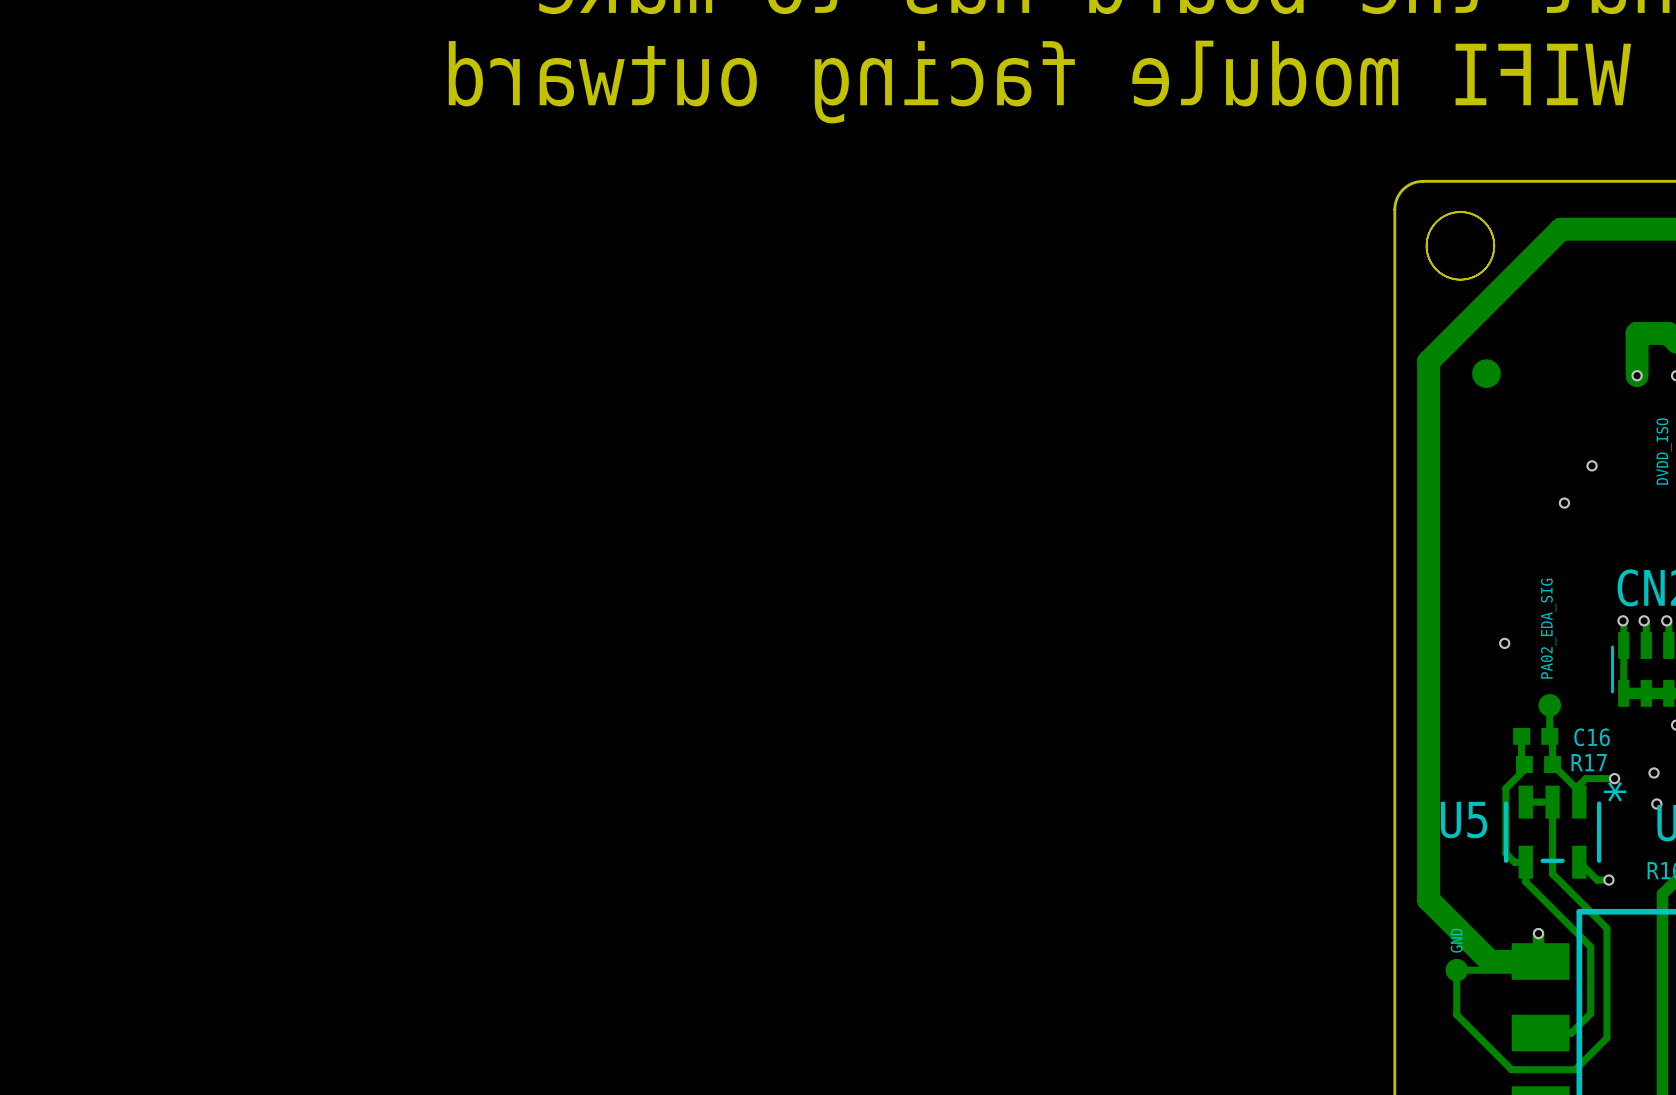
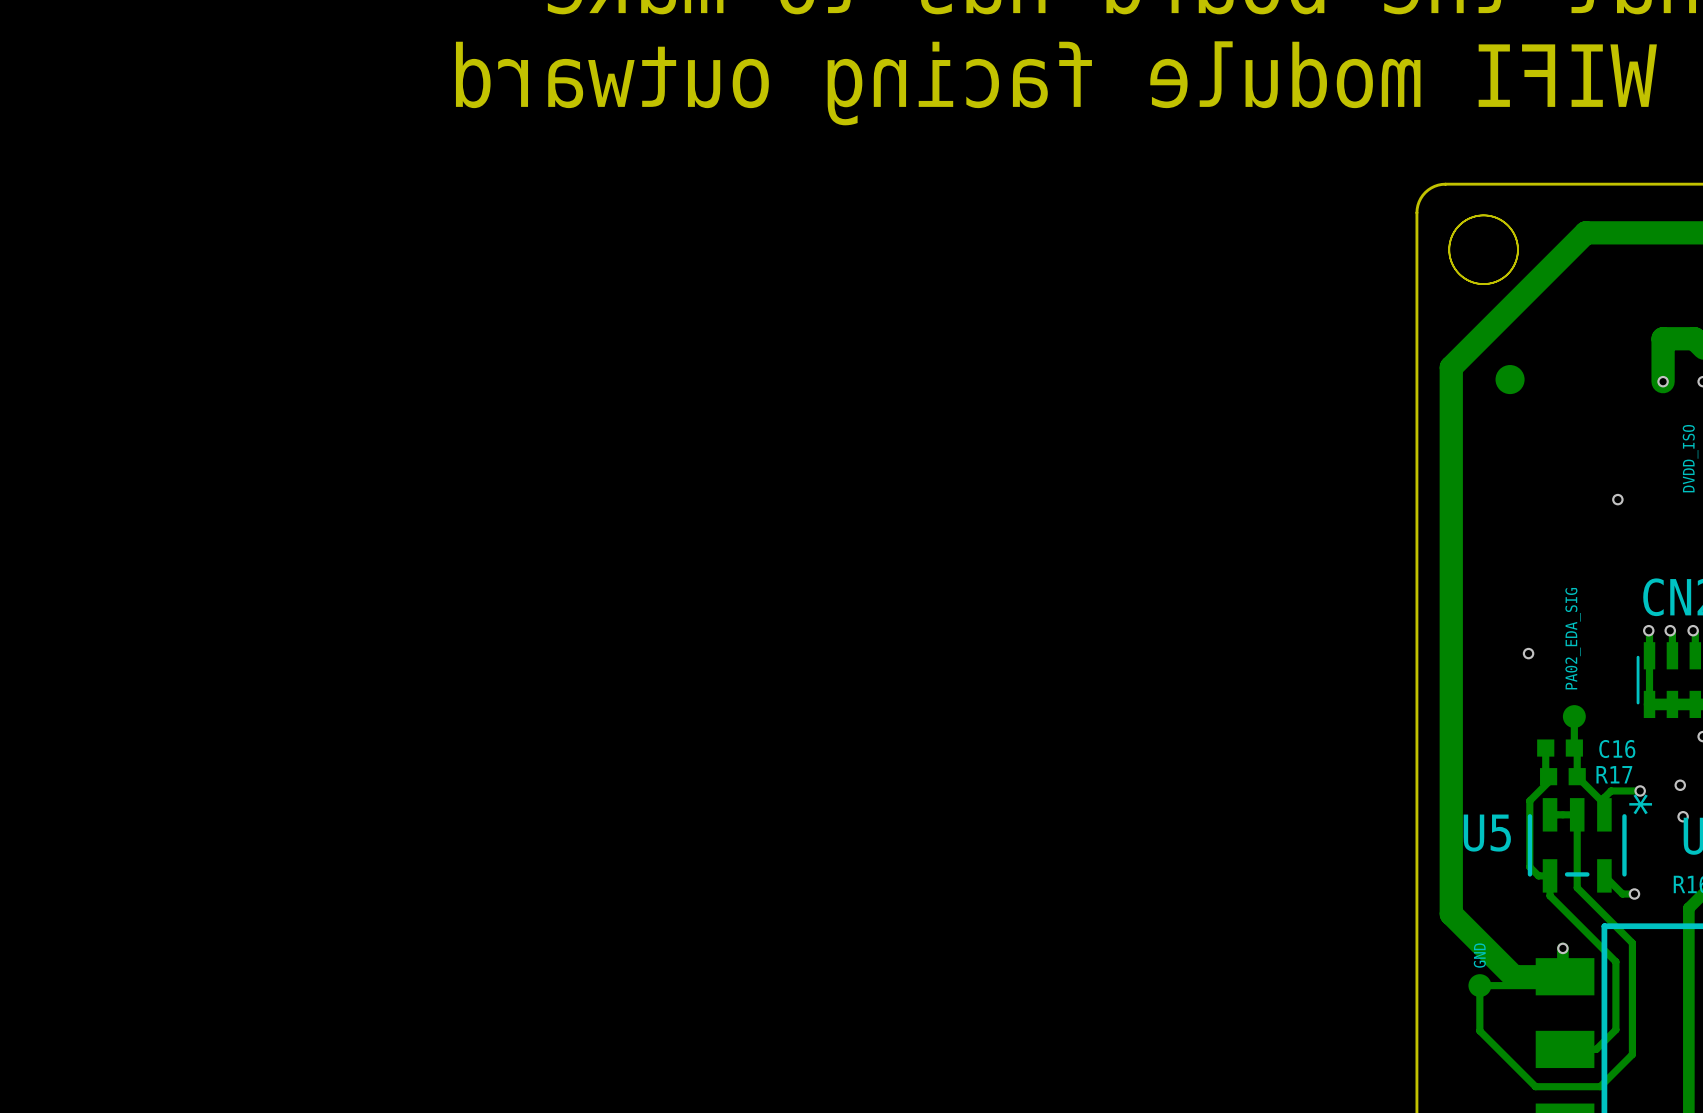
via: (1592, 465) -> none
via: none -> (1617, 499)
via: (1564, 503) -> none

